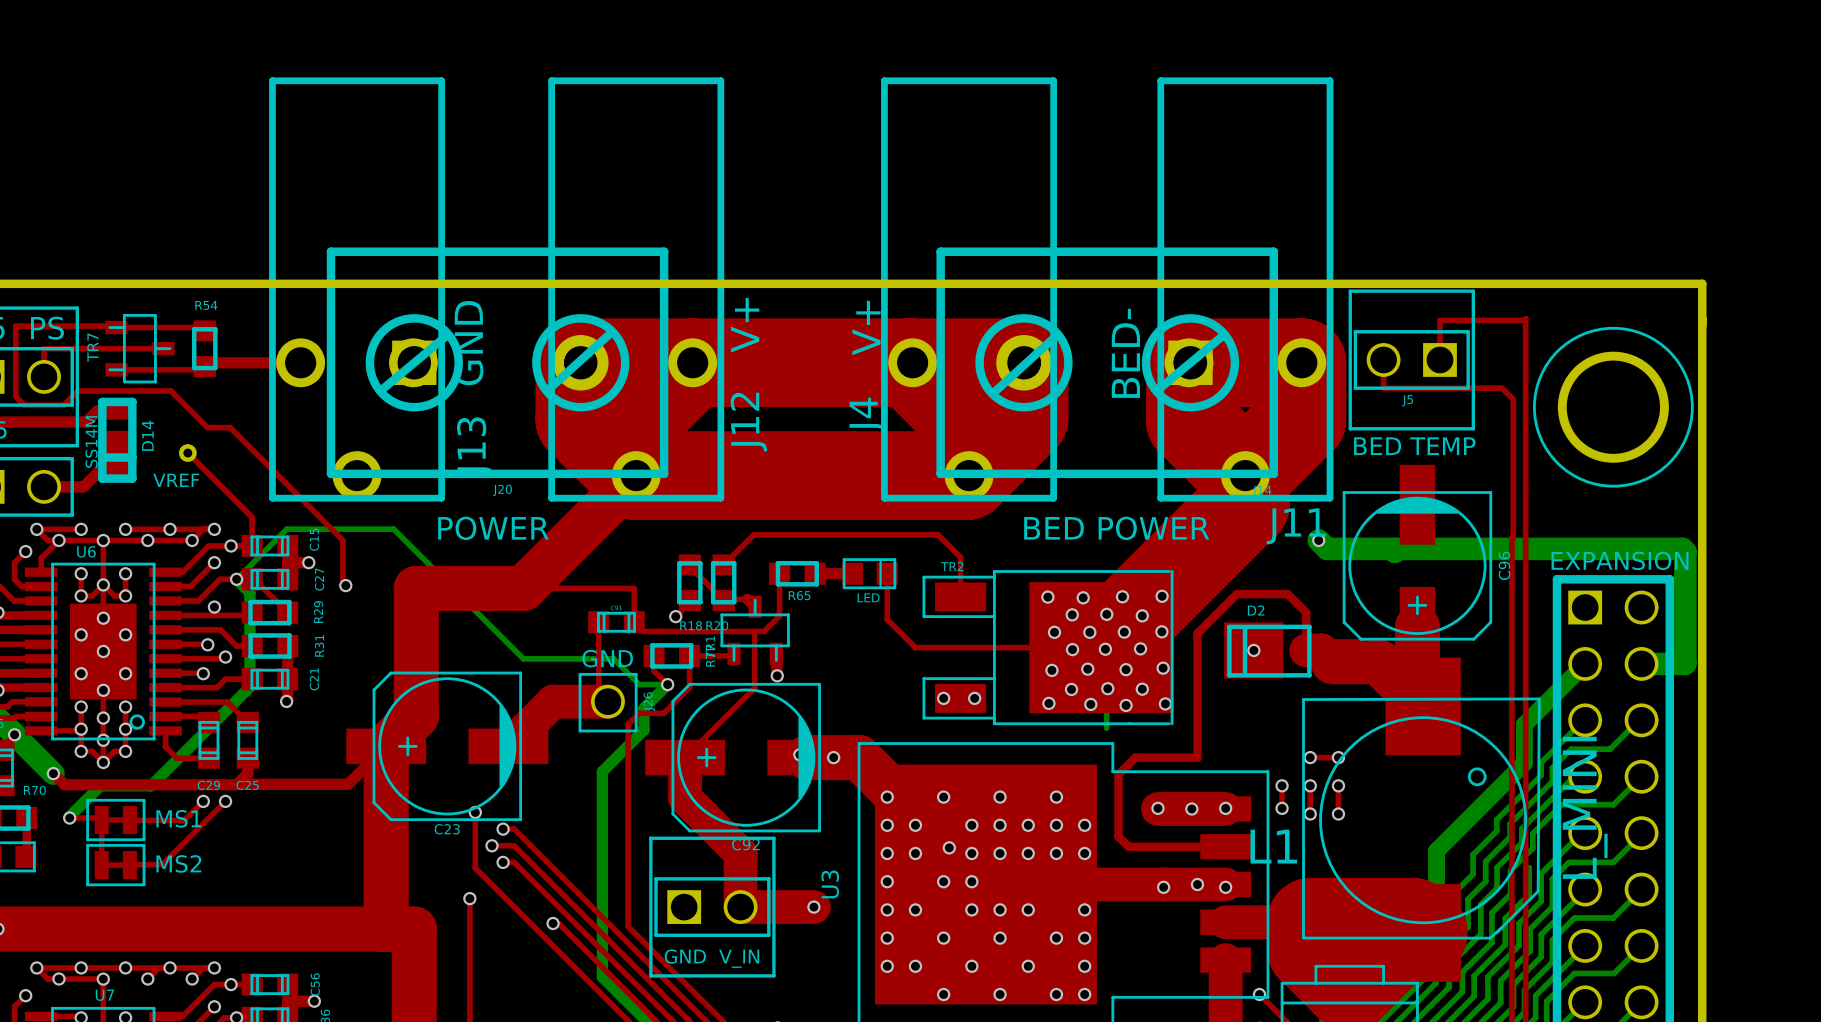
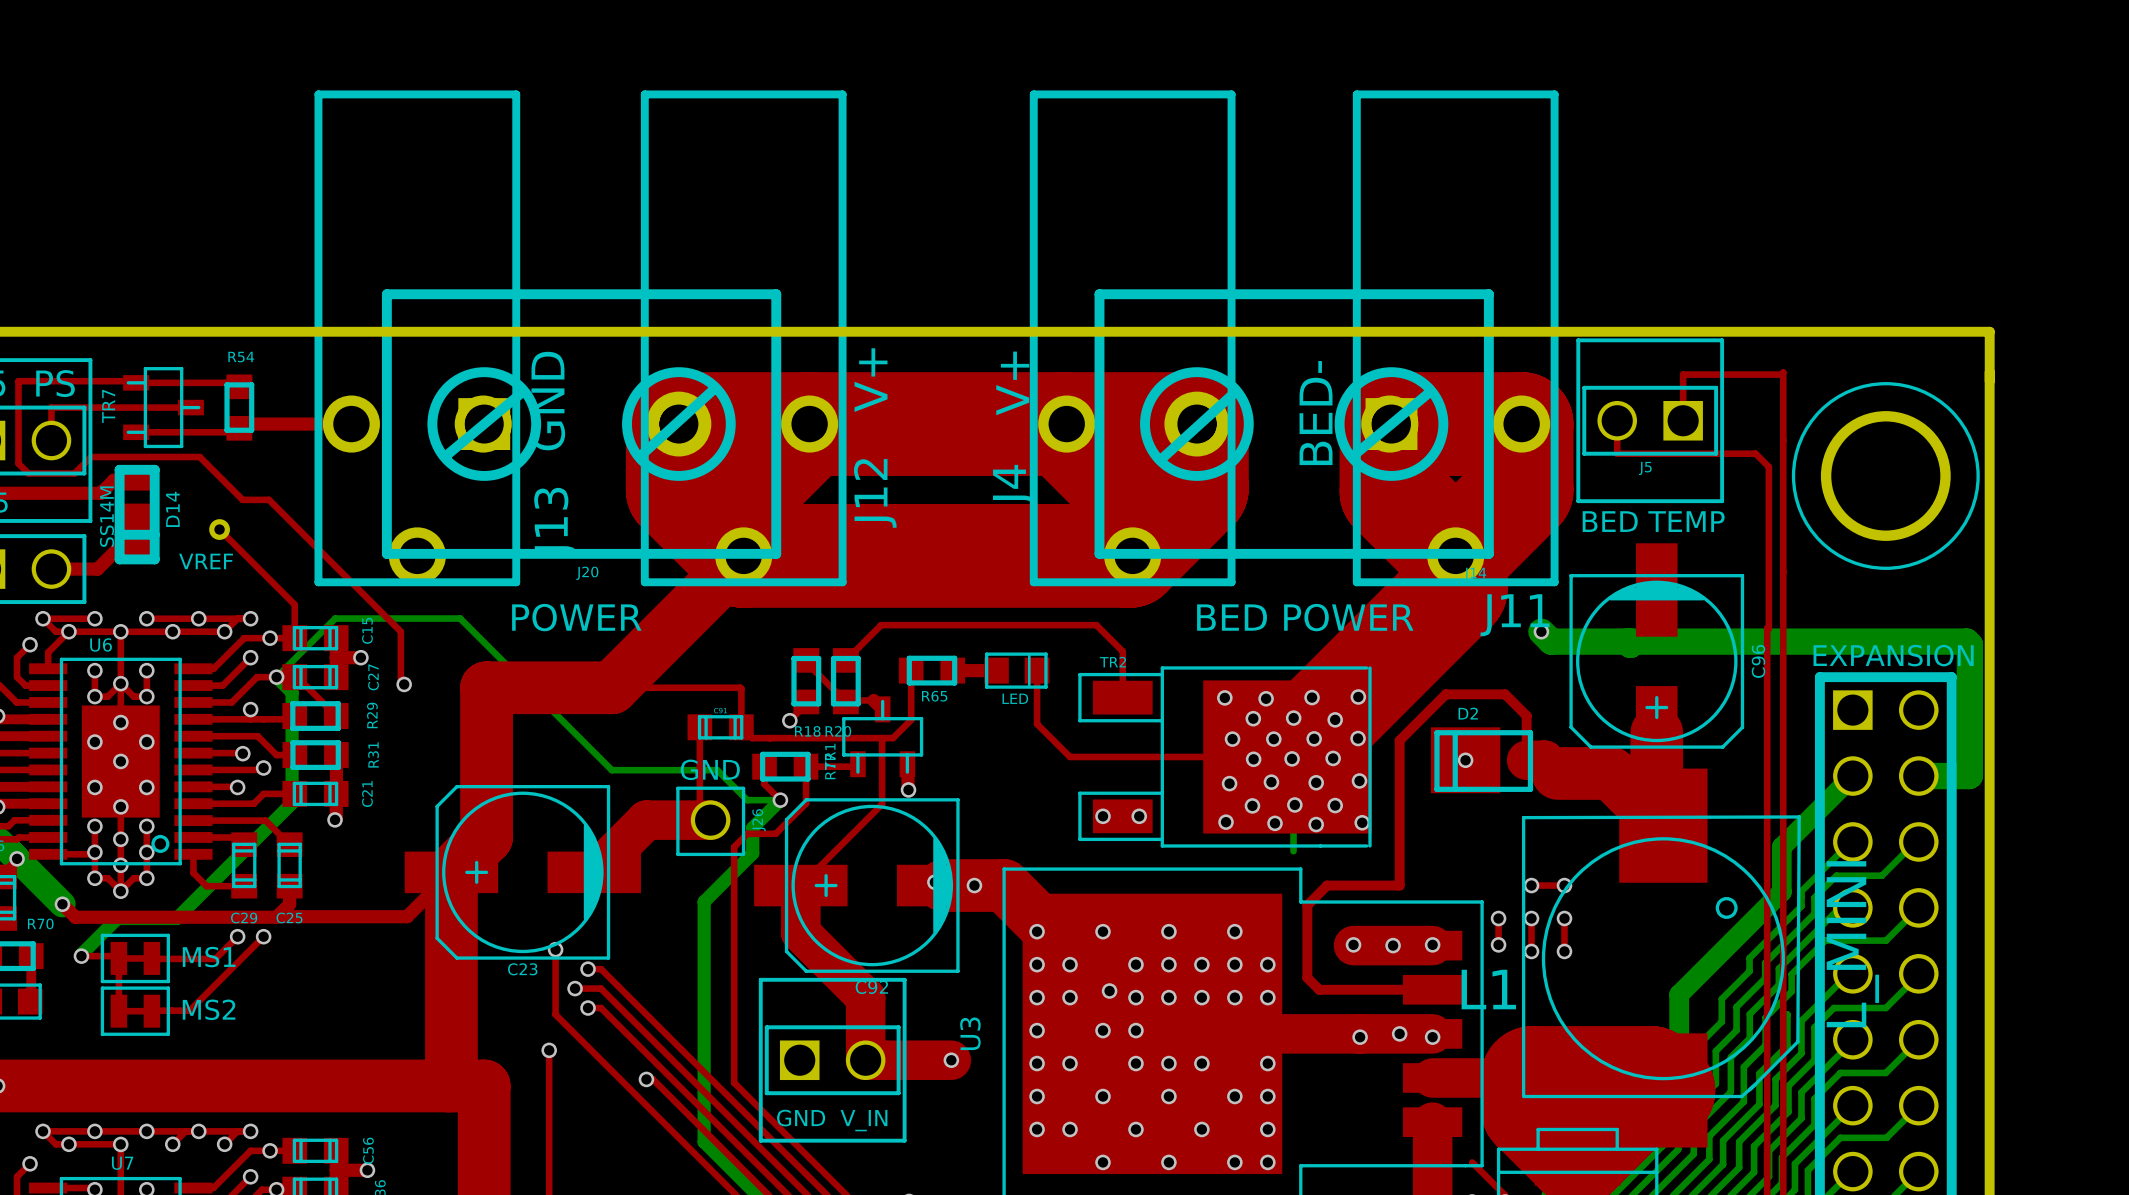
via: (1259, 994) -> none

